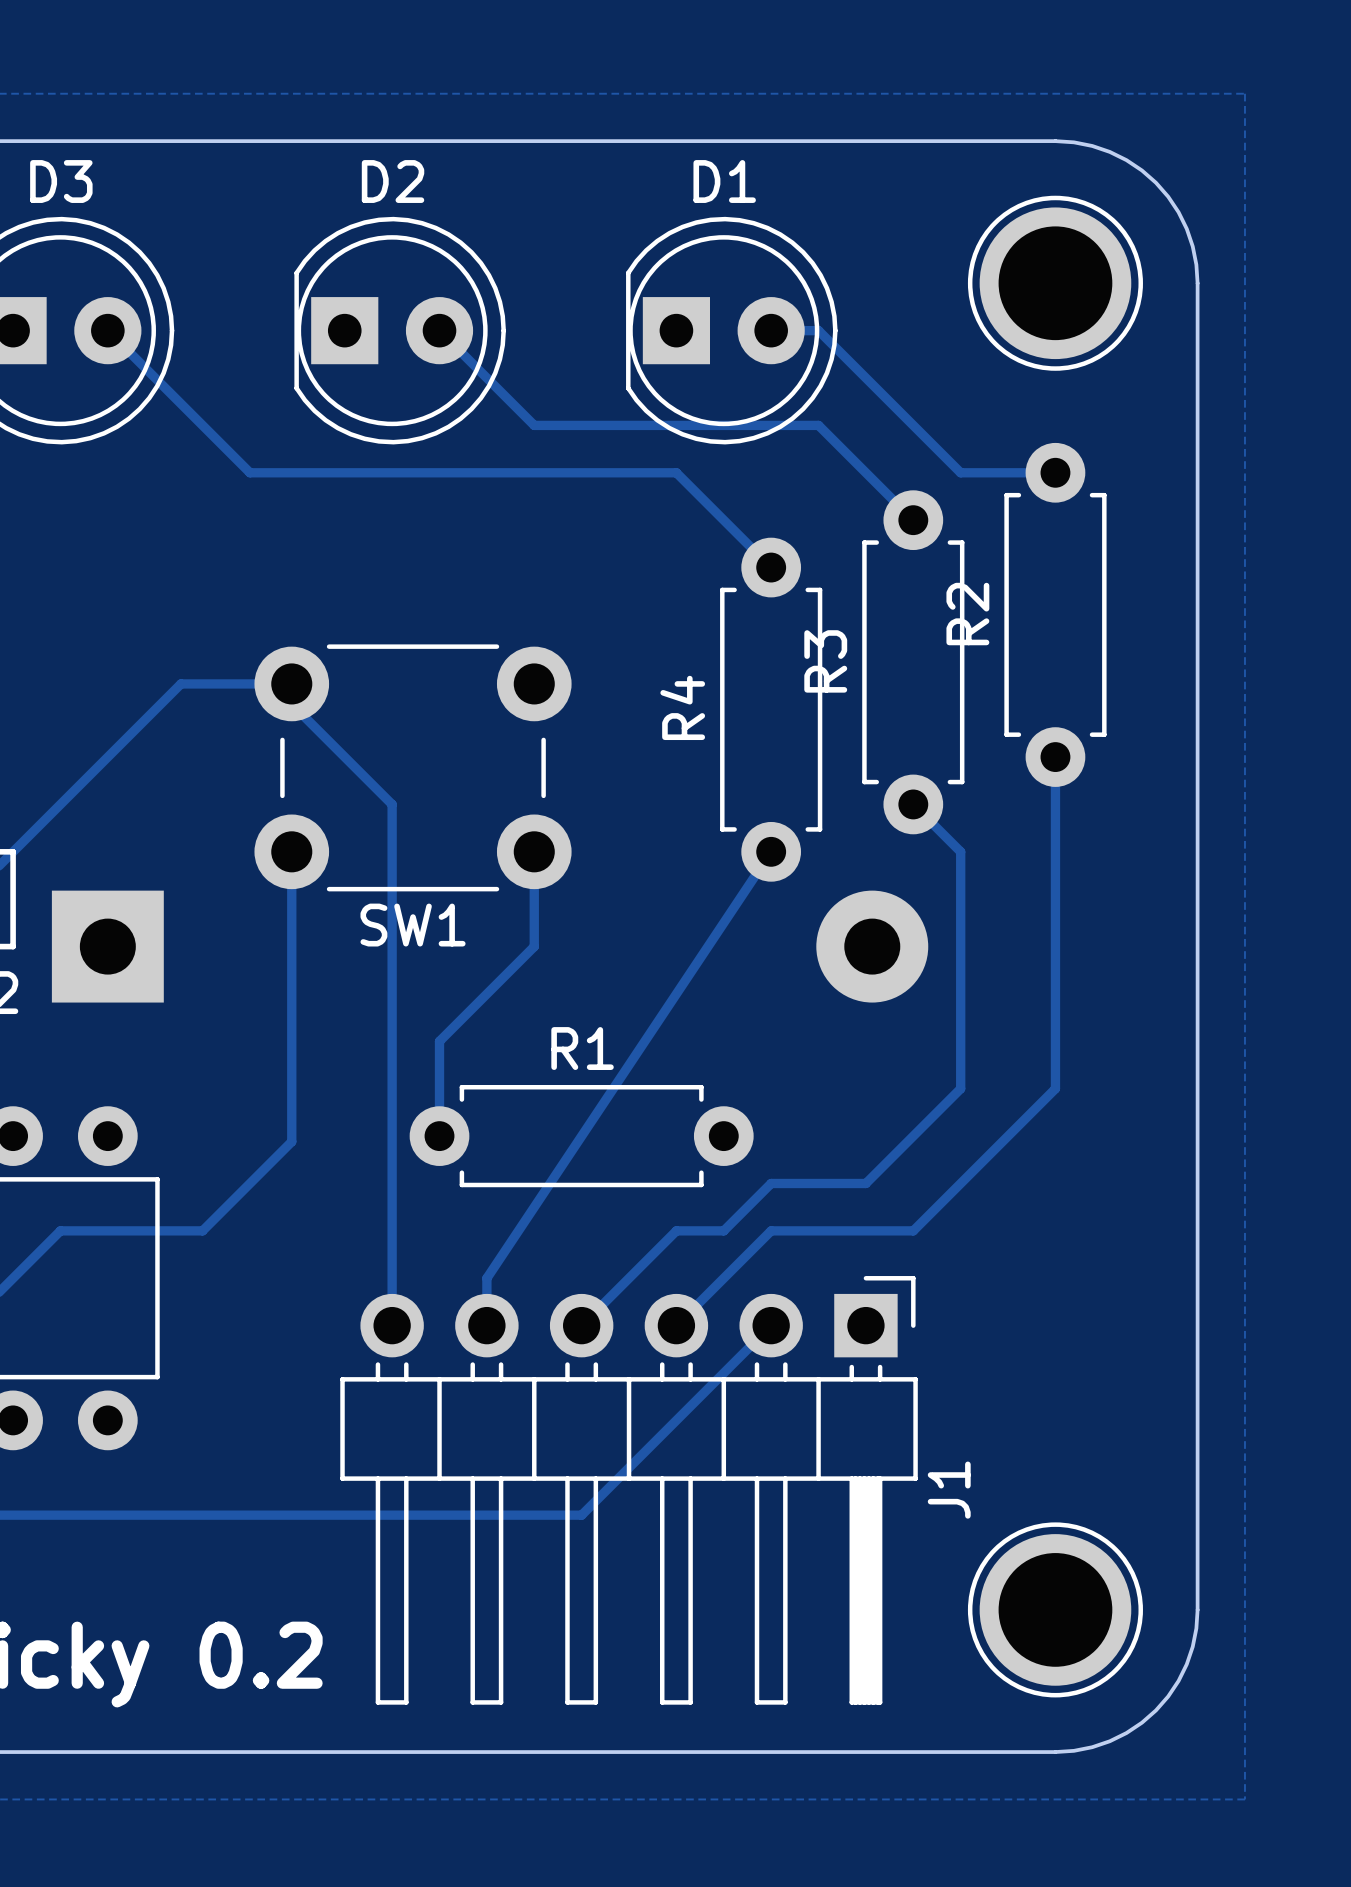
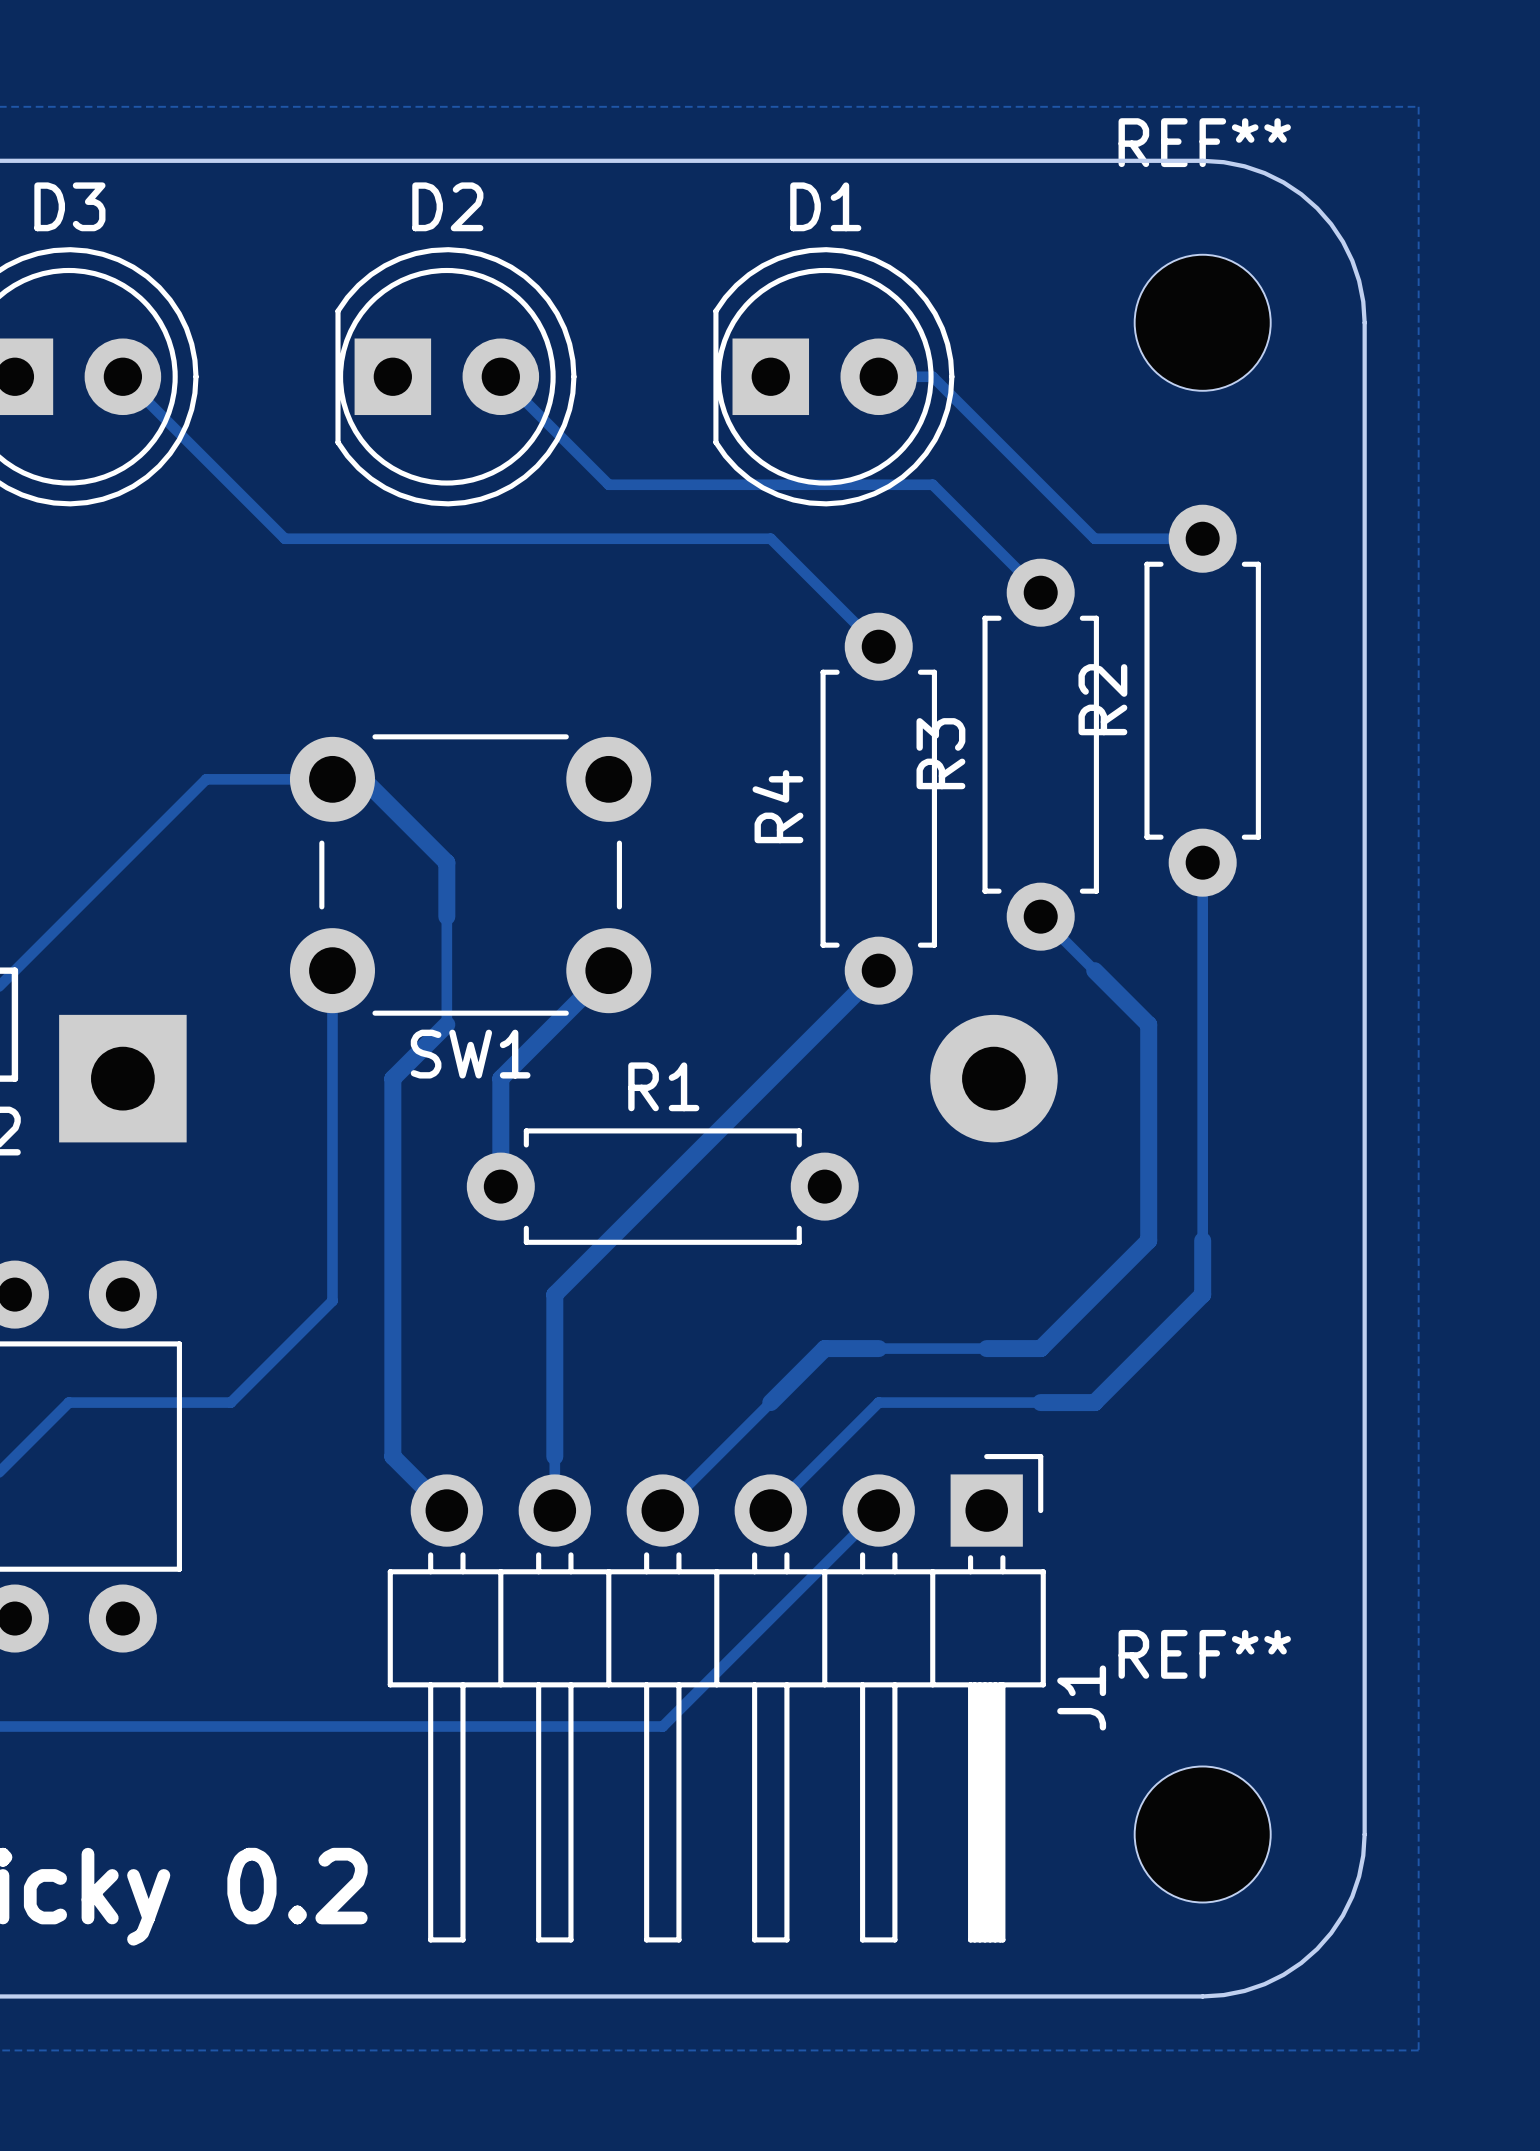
part: (1055, 283) -> none
REF**: none -> (1202, 322)
track: (291, 704) (392, 804) -> (332, 779) (363, 779) (446, 862) (446, 916)
track: (534, 851) (534, 946) (439, 1041) (439, 1136) -> (608, 970) (500, 1078) (500, 1186)
track: (771, 851) (486, 1278) -> (878, 970) (554, 1294) (554, 1456)
track: (960, 851) (960, 1088) (865, 1183) -> (1094, 970) (1148, 1024) (1148, 1240) (1040, 1348) (986, 1348)
track: (392, 899) (392, 1325) -> (446, 1024) (392, 1078) (392, 1456) (446, 1510)
track: (1055, 1088) (913, 1230) -> (1202, 1240) (1202, 1294) (1094, 1402) (1040, 1402)
R1 position: (581, 1136) -> (662, 1186)
track: (771, 1183) (723, 1230) (676, 1230) -> (878, 1348) (824, 1348) (770, 1402)
part: (1055, 1609) -> none
REF**: none -> (1202, 1834)

